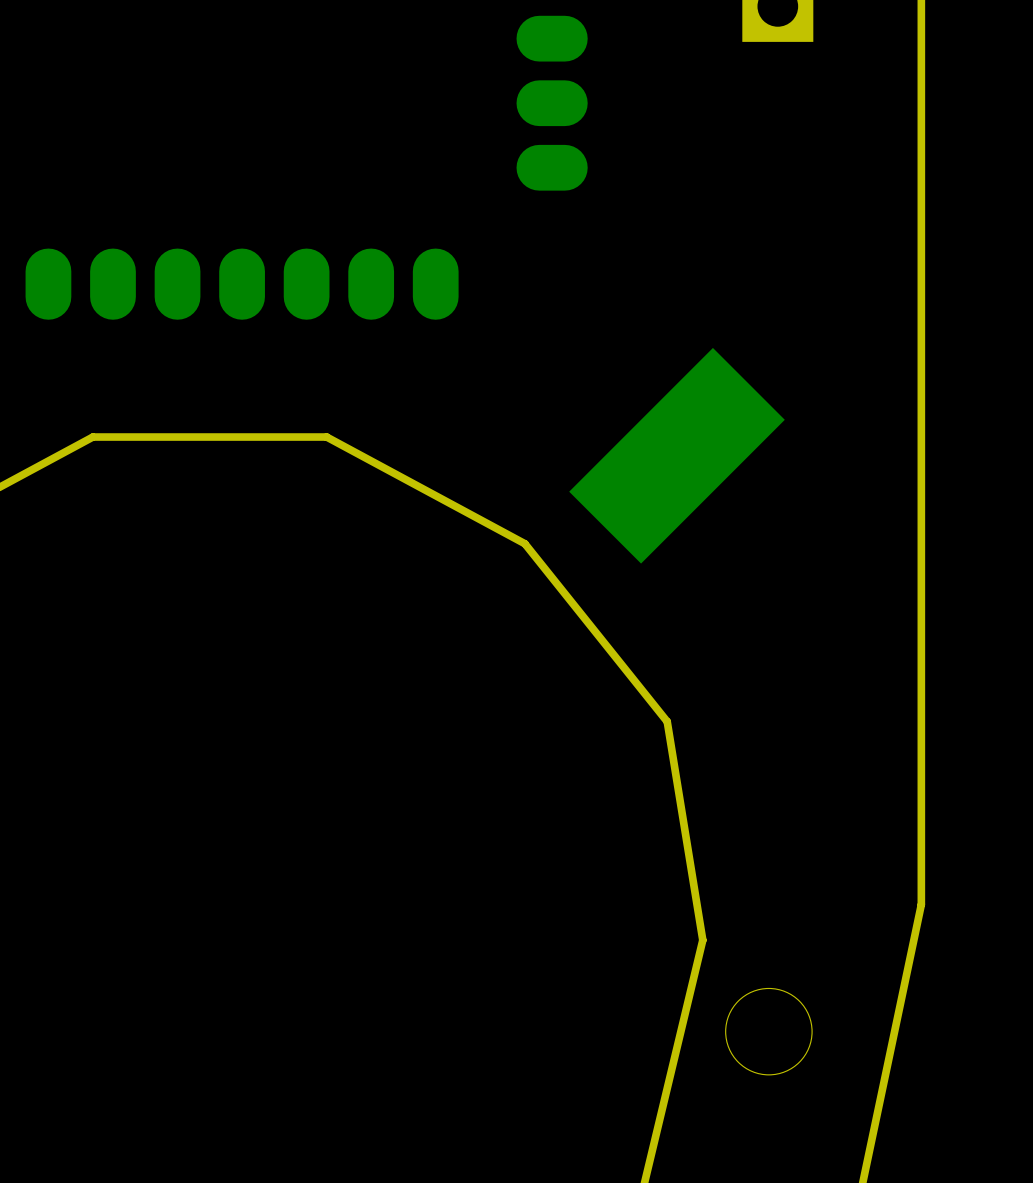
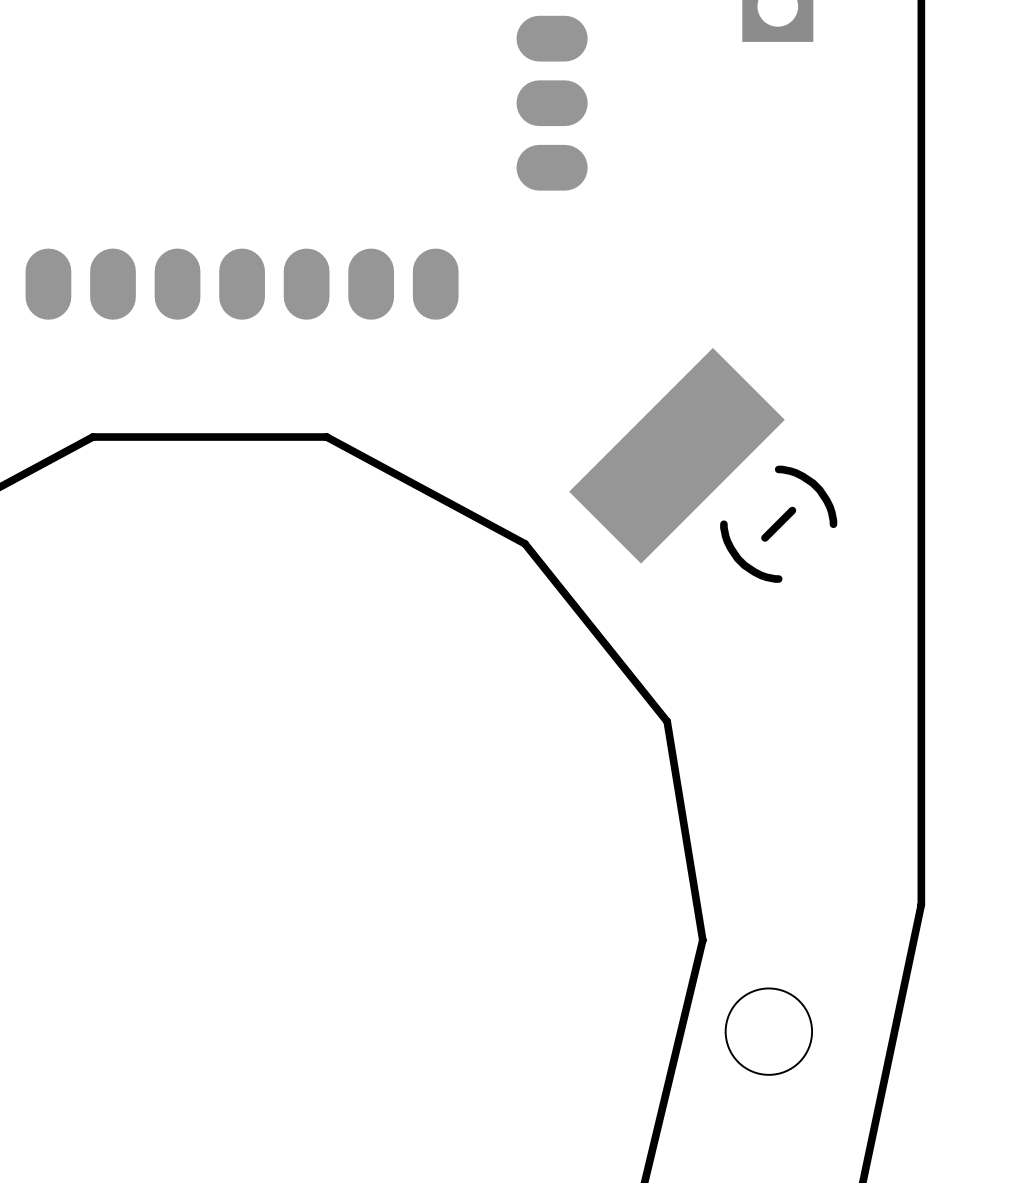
part text: none -> (-) (778, 524)

